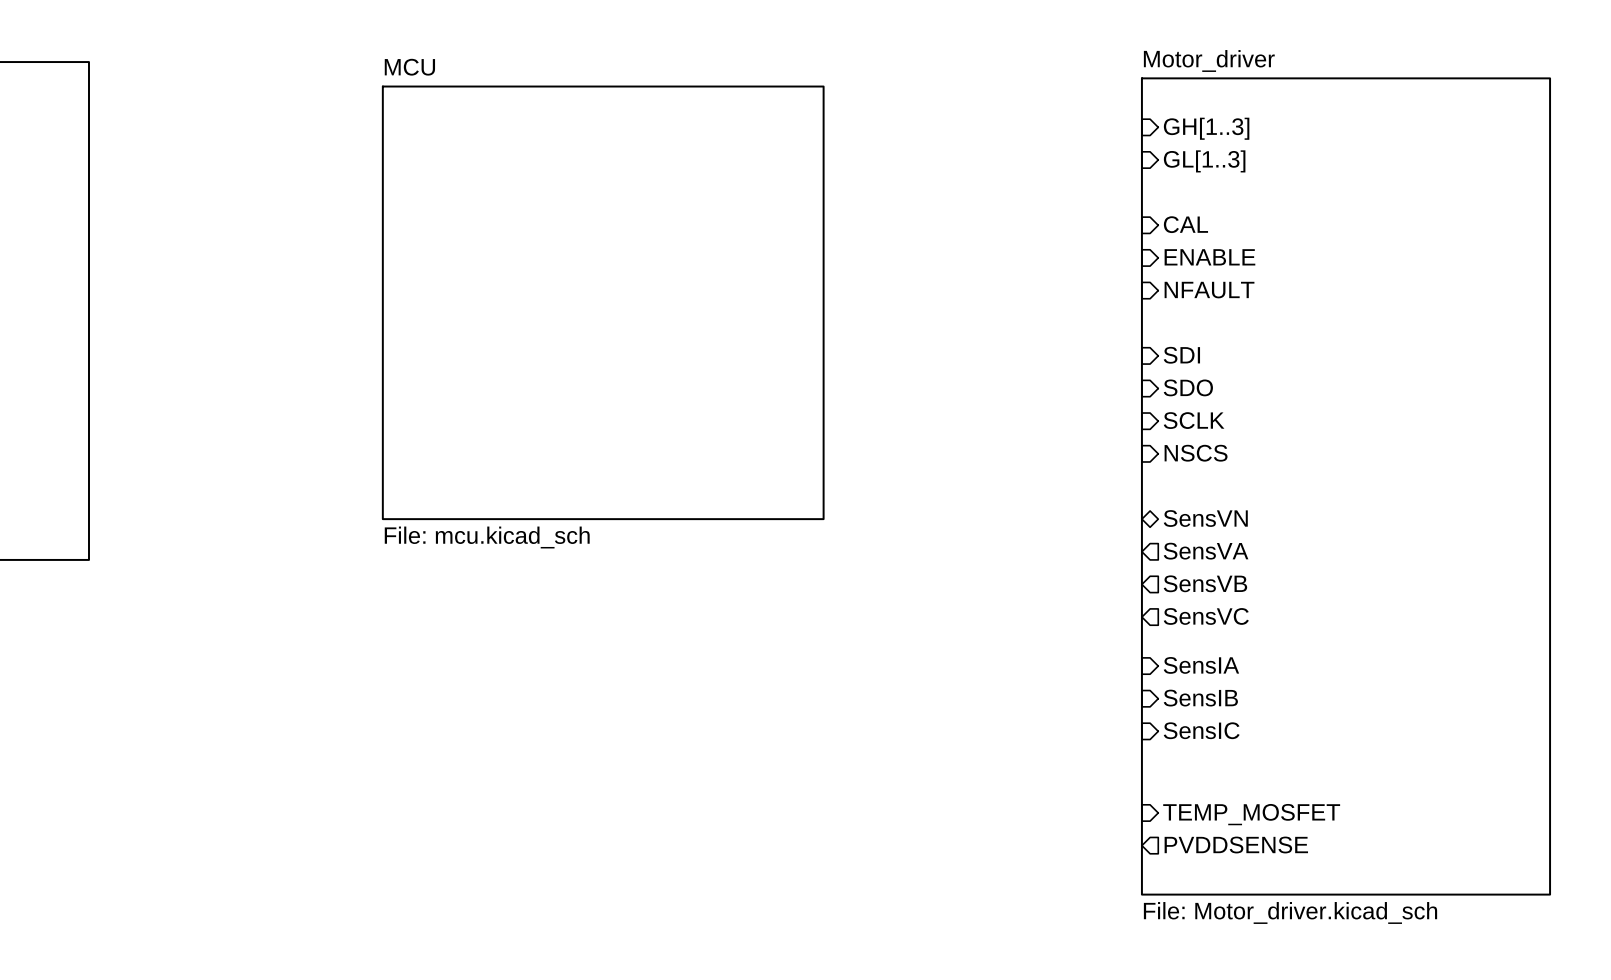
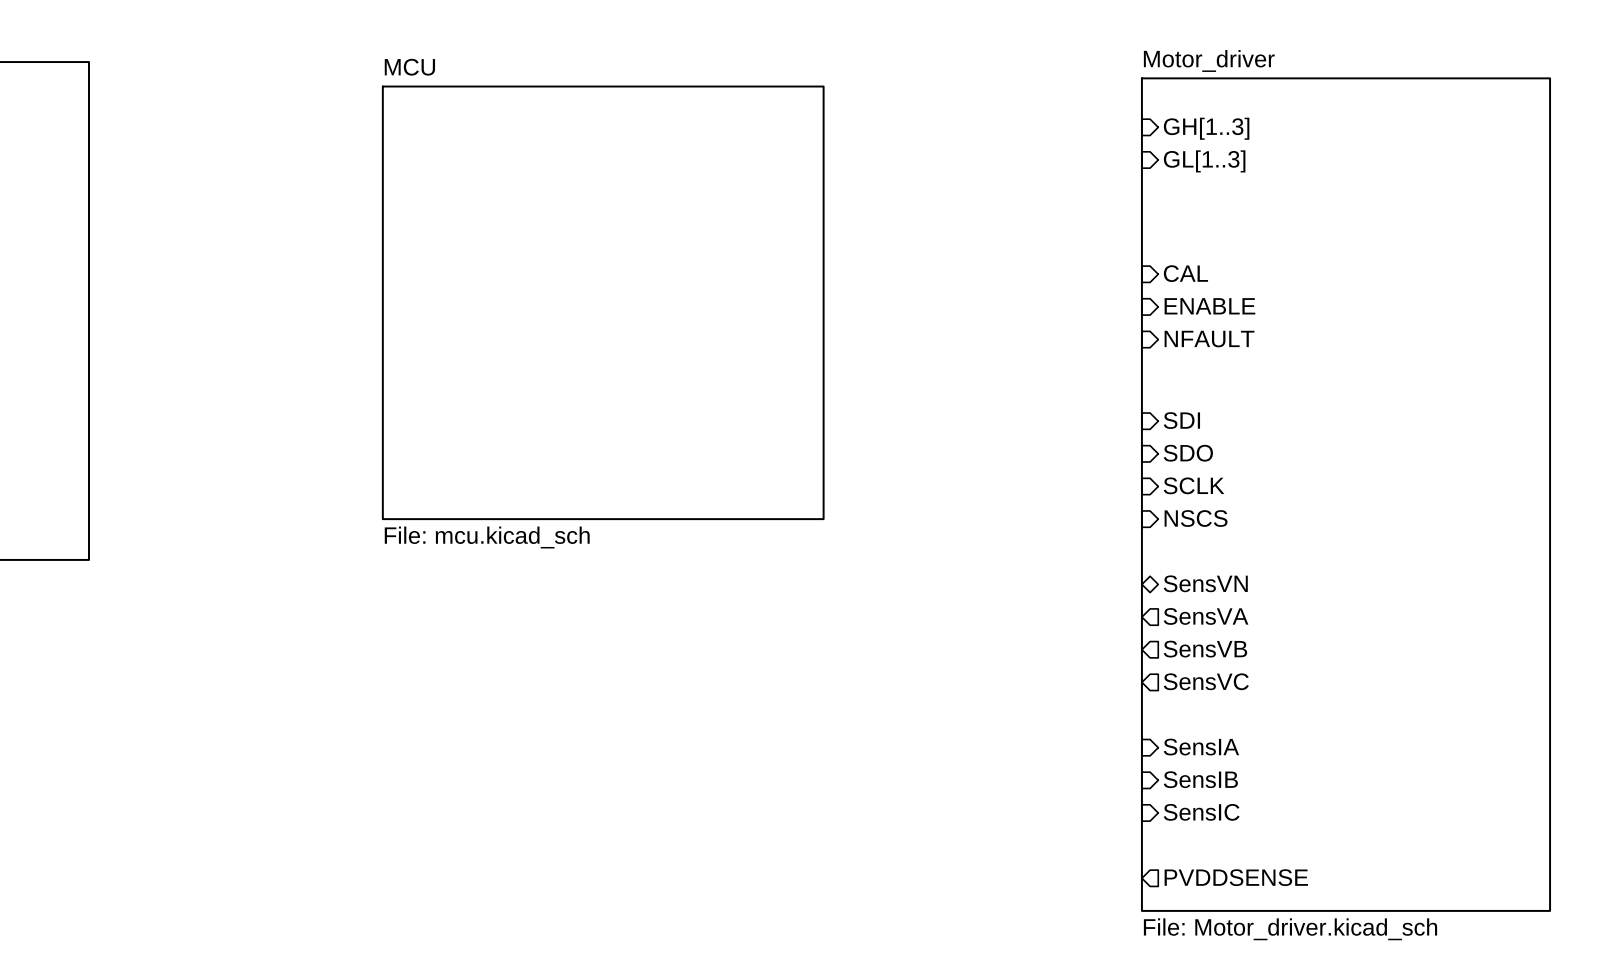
sheet Motor_driver shape: [1140, 77, 1552, 896] -> [1140, 77, 1552, 912]
sheet pin position: CAL (1185, 224) -> CAL (1185, 273)
sheet pin position: ENABLE (1209, 257) -> ENABLE (1209, 306)
sheet pin position: NFAULT (1209, 290) -> NFAULT (1209, 339)
sheet pin: SDI (1181, 355) -> none
sheet pin: SDO (1188, 387) -> none
sheet pin: SCLK (1194, 420) -> SDI (1181, 420)
sheet pin: NSCS (1196, 453) -> SDO (1188, 453)
sheet pin: none -> SCLK (1194, 485)
sheet pin shape: bidirectional (1205, 518) -> input (1196, 518)
sheet pin: SensVN (1205, 518) -> NSCS (1196, 518)
sheet pin: SensVA (1206, 551) -> none
sheet pin shape: output (1205, 583) -> bidirectional (1205, 583)
sheet pin: SensVB (1205, 583) -> SensVN (1205, 583)
sheet pin: SensVC (1206, 616) -> SensVA (1206, 616)
sheet pin: none -> SensVB (1205, 649)
sheet pin position: SensIA (1201, 665) -> SensIA (1201, 747)
sheet pin: none -> SensVC (1206, 681)
sheet pin position: SensIB (1200, 698) -> SensIB (1200, 779)
sheet pin: SensIC (1201, 730) -> none
sheet pin: TEMP_MOSFET (1251, 814) -> SensIC (1201, 812)
sheet pin position: PVDDSENSE (1236, 845) -> PVDDSENSE (1236, 877)

